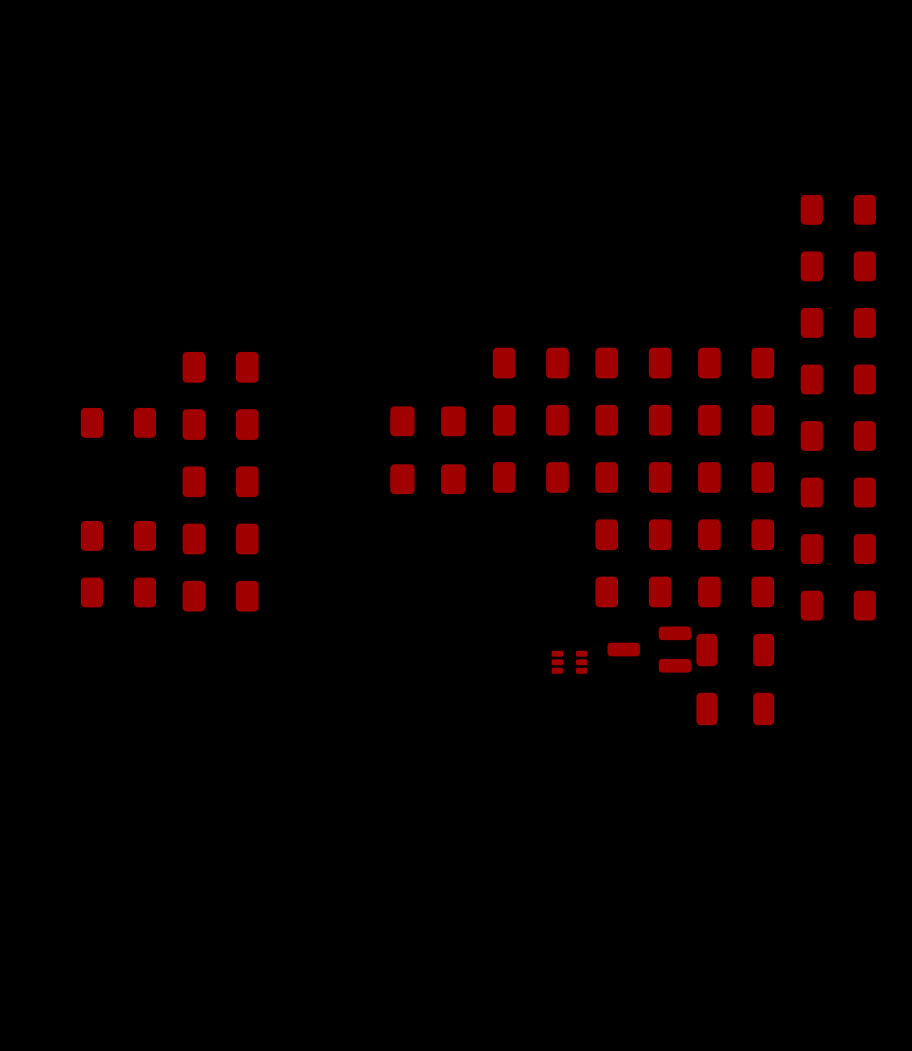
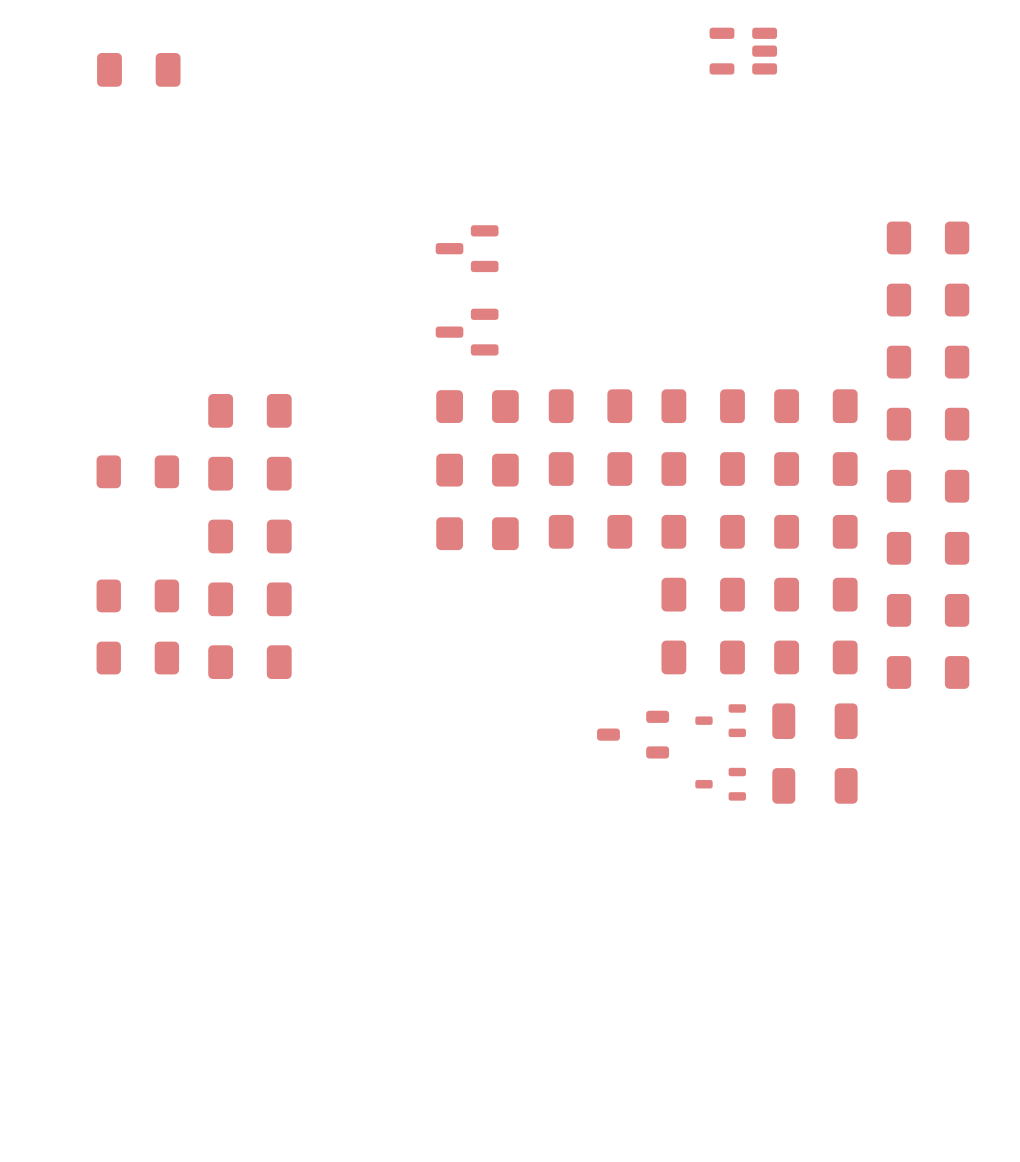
part: none -> (743, 51)
part: none -> (138, 69)
part: none -> (467, 248)
part: none -> (467, 332)
part: none -> (477, 406)
part footprint: [607, 626, 692, 673] -> [695, 704, 746, 738]
part footprint: [551, 650, 588, 674] -> [597, 710, 670, 759]
part: none -> (720, 784)

